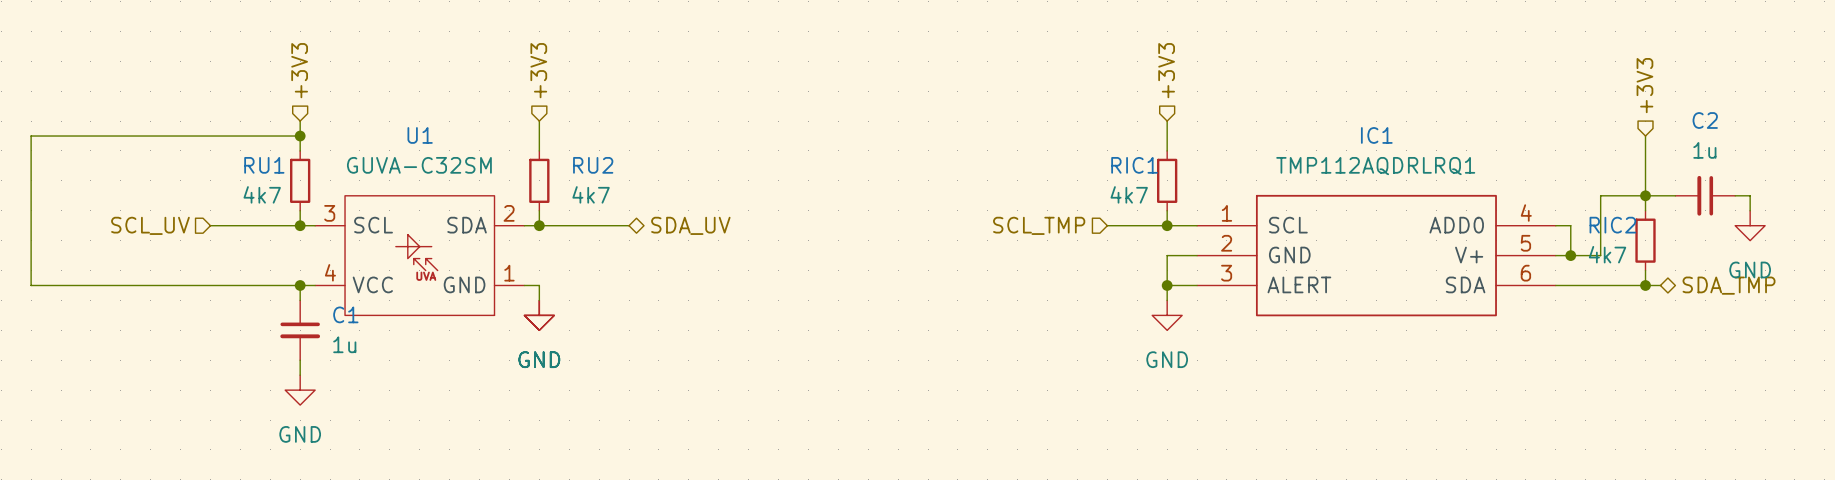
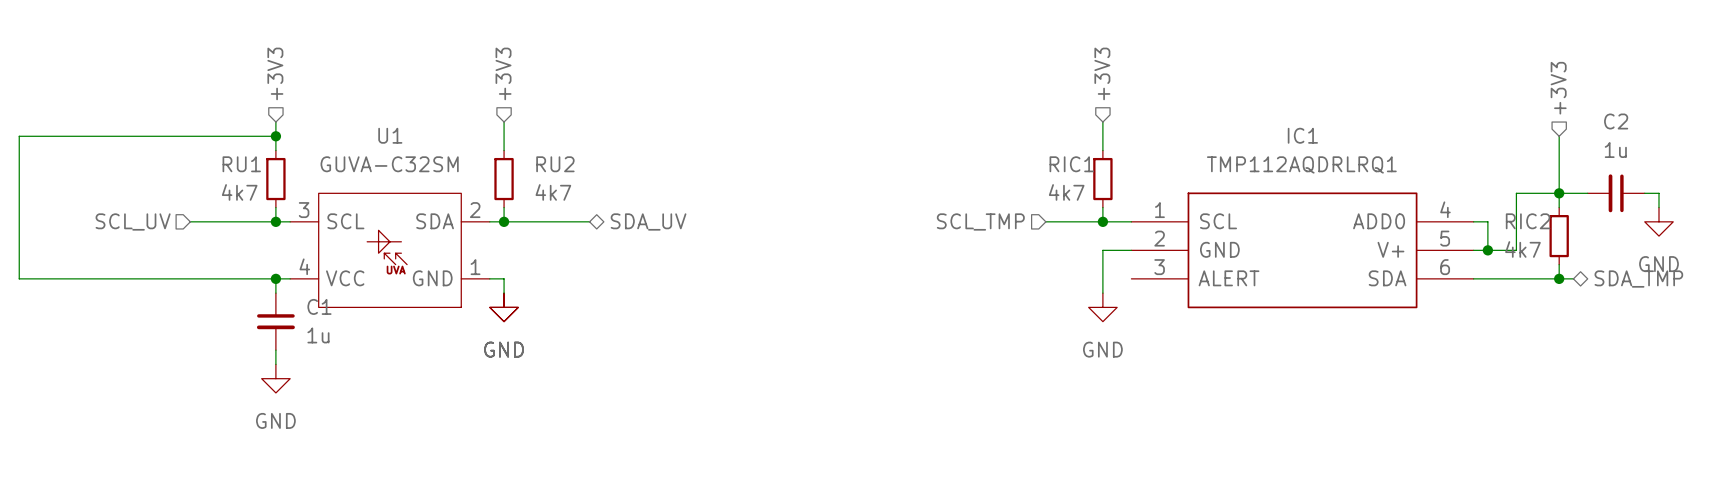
wire: (1167, 285) (1197, 285) -> none
junction: (1167, 285) -> none

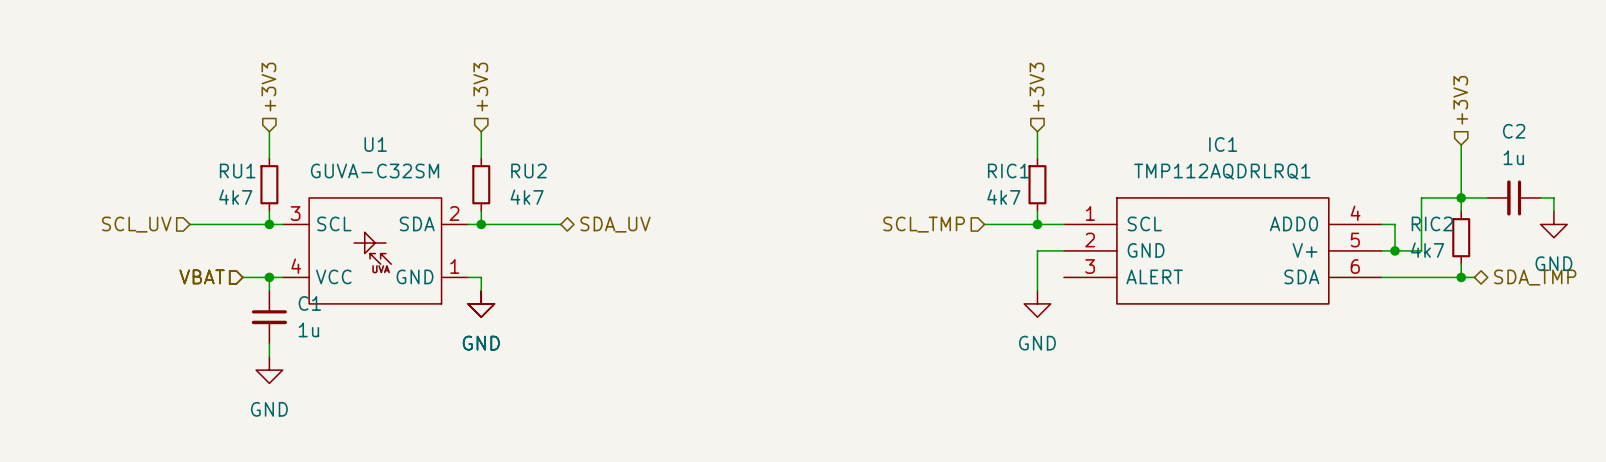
wire: (275, 136) (19, 136) (19, 278) (247, 278) -> none
junction: (275, 136) -> none
hierarchical label: none -> VBAT (202, 276)

